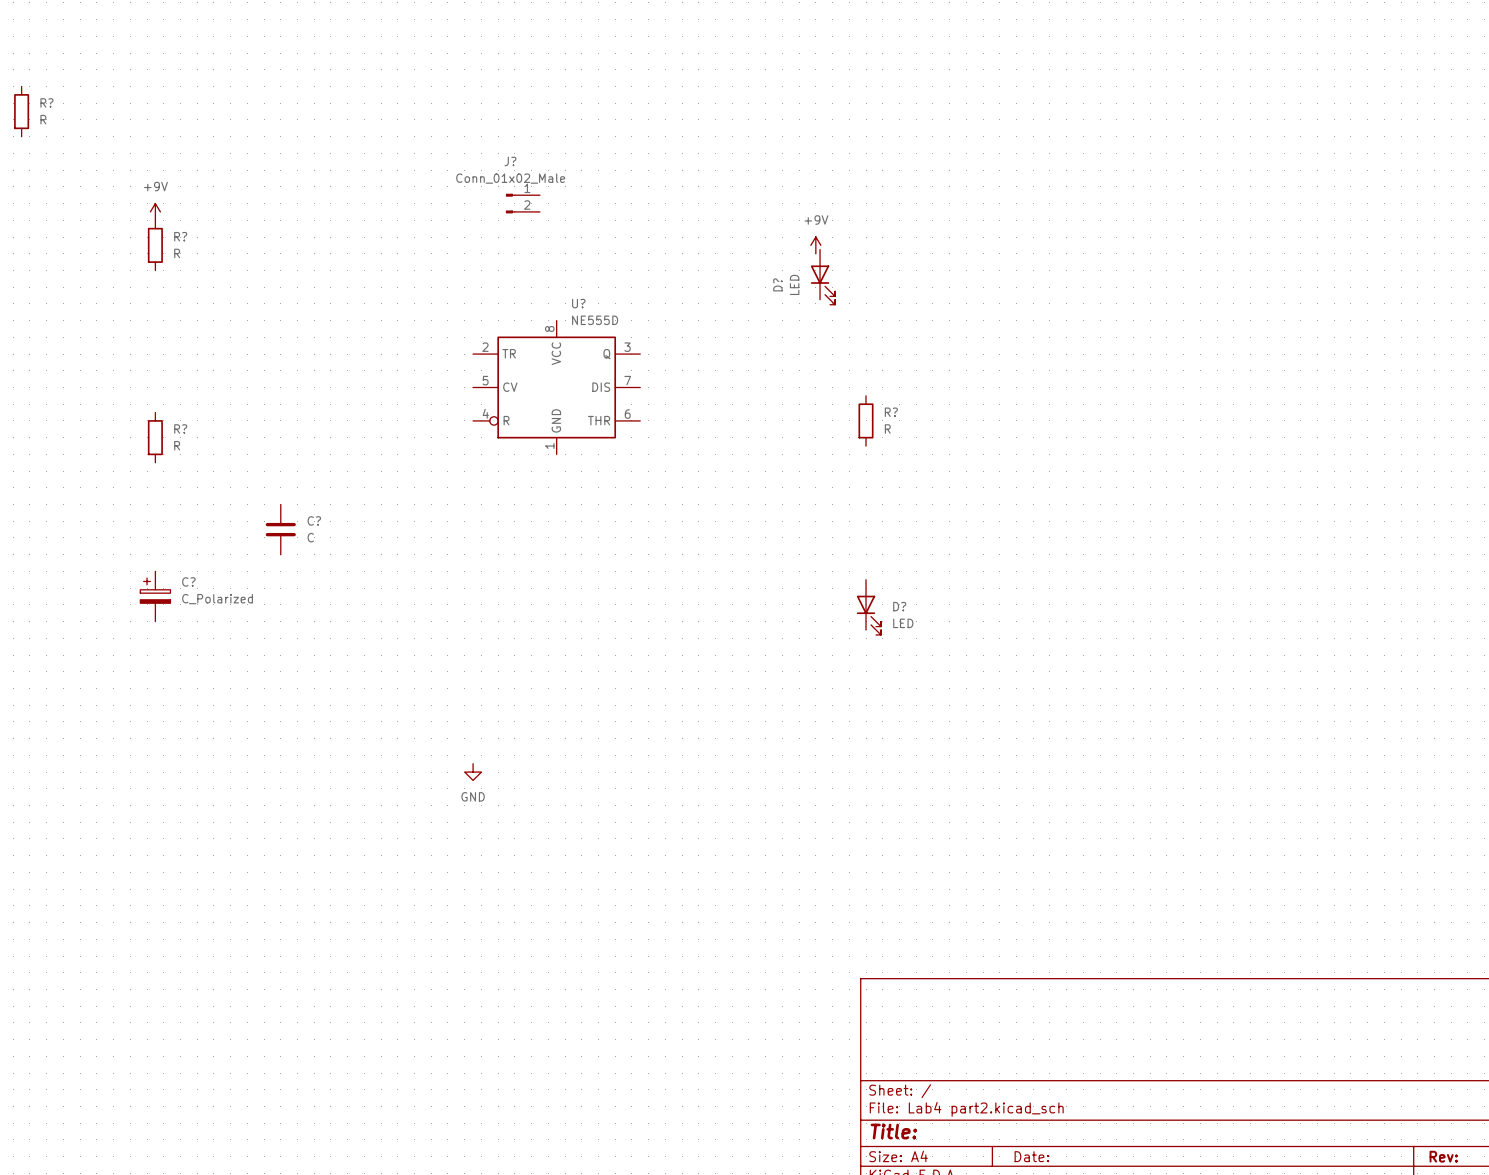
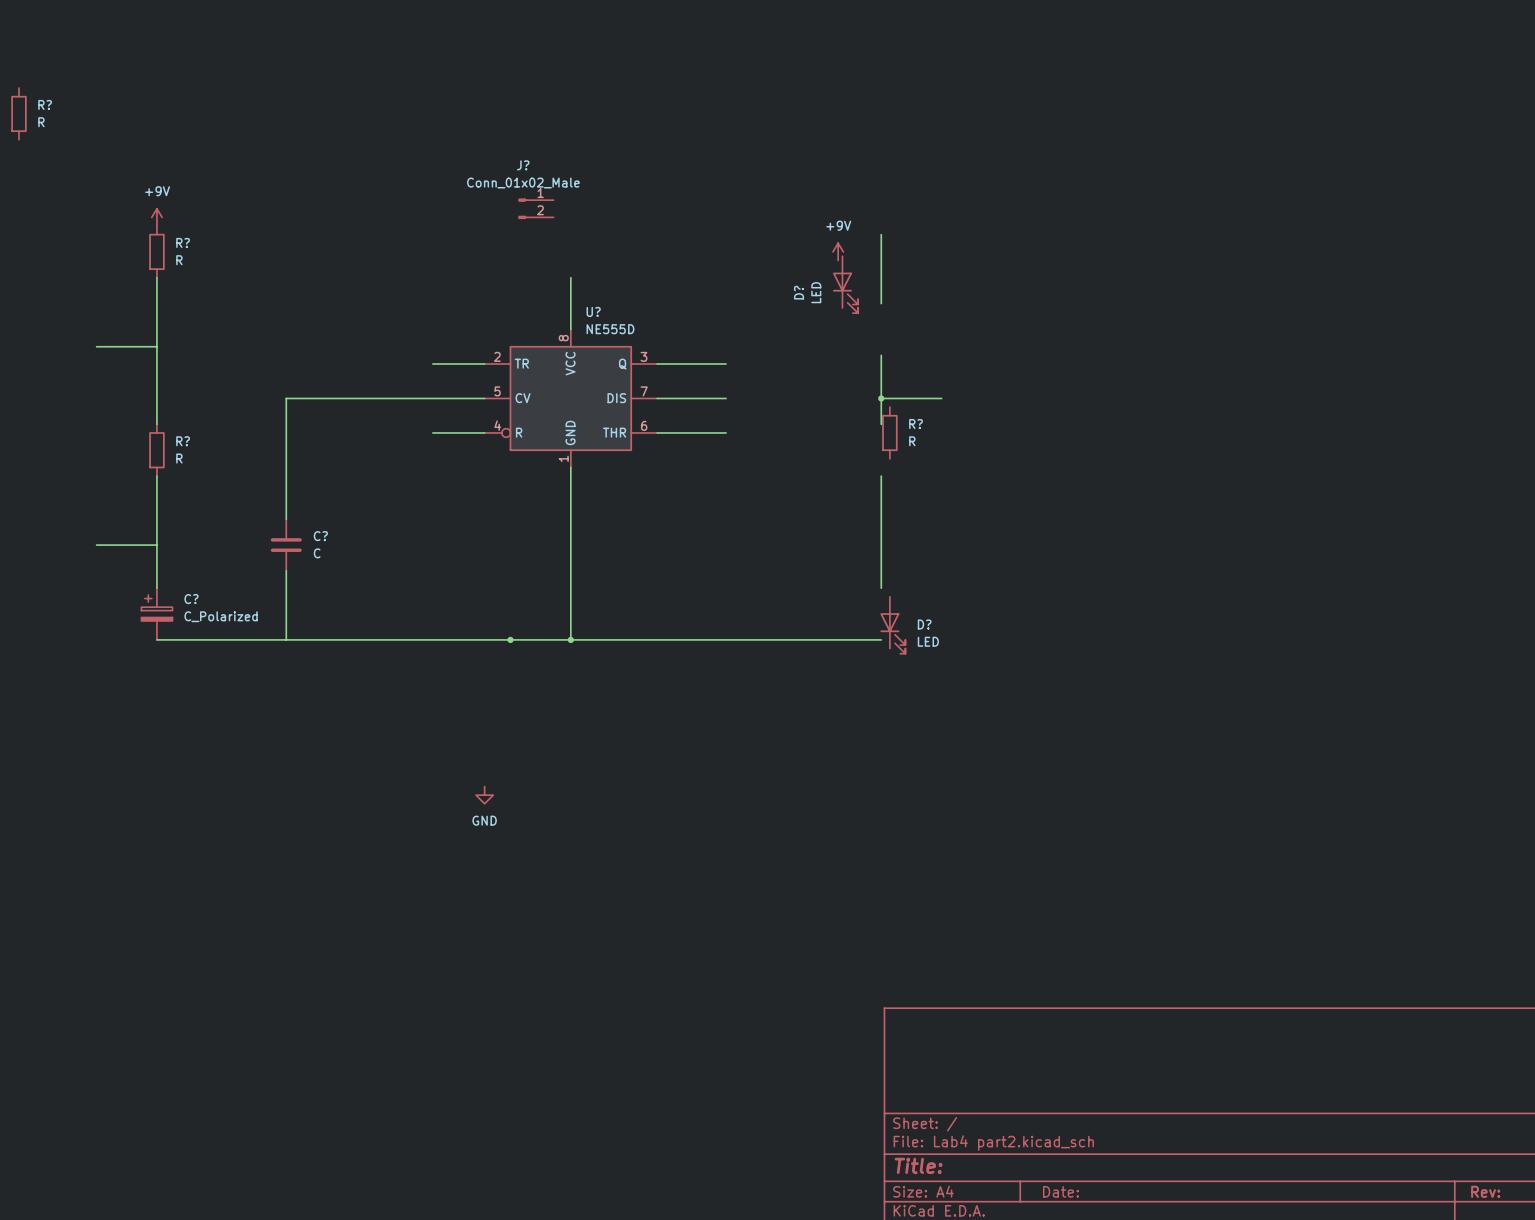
wire: none -> (881, 234) (881, 303)
wire: none -> (156, 277) (156, 424)
wire: none -> (570, 277) (570, 329)
wire: none -> (96, 346) (156, 346)
wire: none -> (881, 355) (881, 424)
wire: none -> (432, 363) (484, 363)
wire: none -> (657, 363) (726, 363)
wire: none -> (484, 398) (286, 398) (286, 519)
wire: none -> (657, 398) (726, 398)
wire: none -> (881, 398) (941, 398)
junction: none -> (881, 398)
wire: none -> (432, 432) (484, 432)
wire: none -> (657, 432) (726, 432)
wire: none -> (570, 467) (570, 639)
wire: none -> (156, 476) (156, 588)
wire: none -> (881, 476) (881, 588)
wire: none -> (96, 545) (156, 545)
wire: none -> (286, 570) (286, 639)
wire: none -> (156, 639) (881, 639)
junction: none -> (510, 639)
junction: none -> (570, 639)

